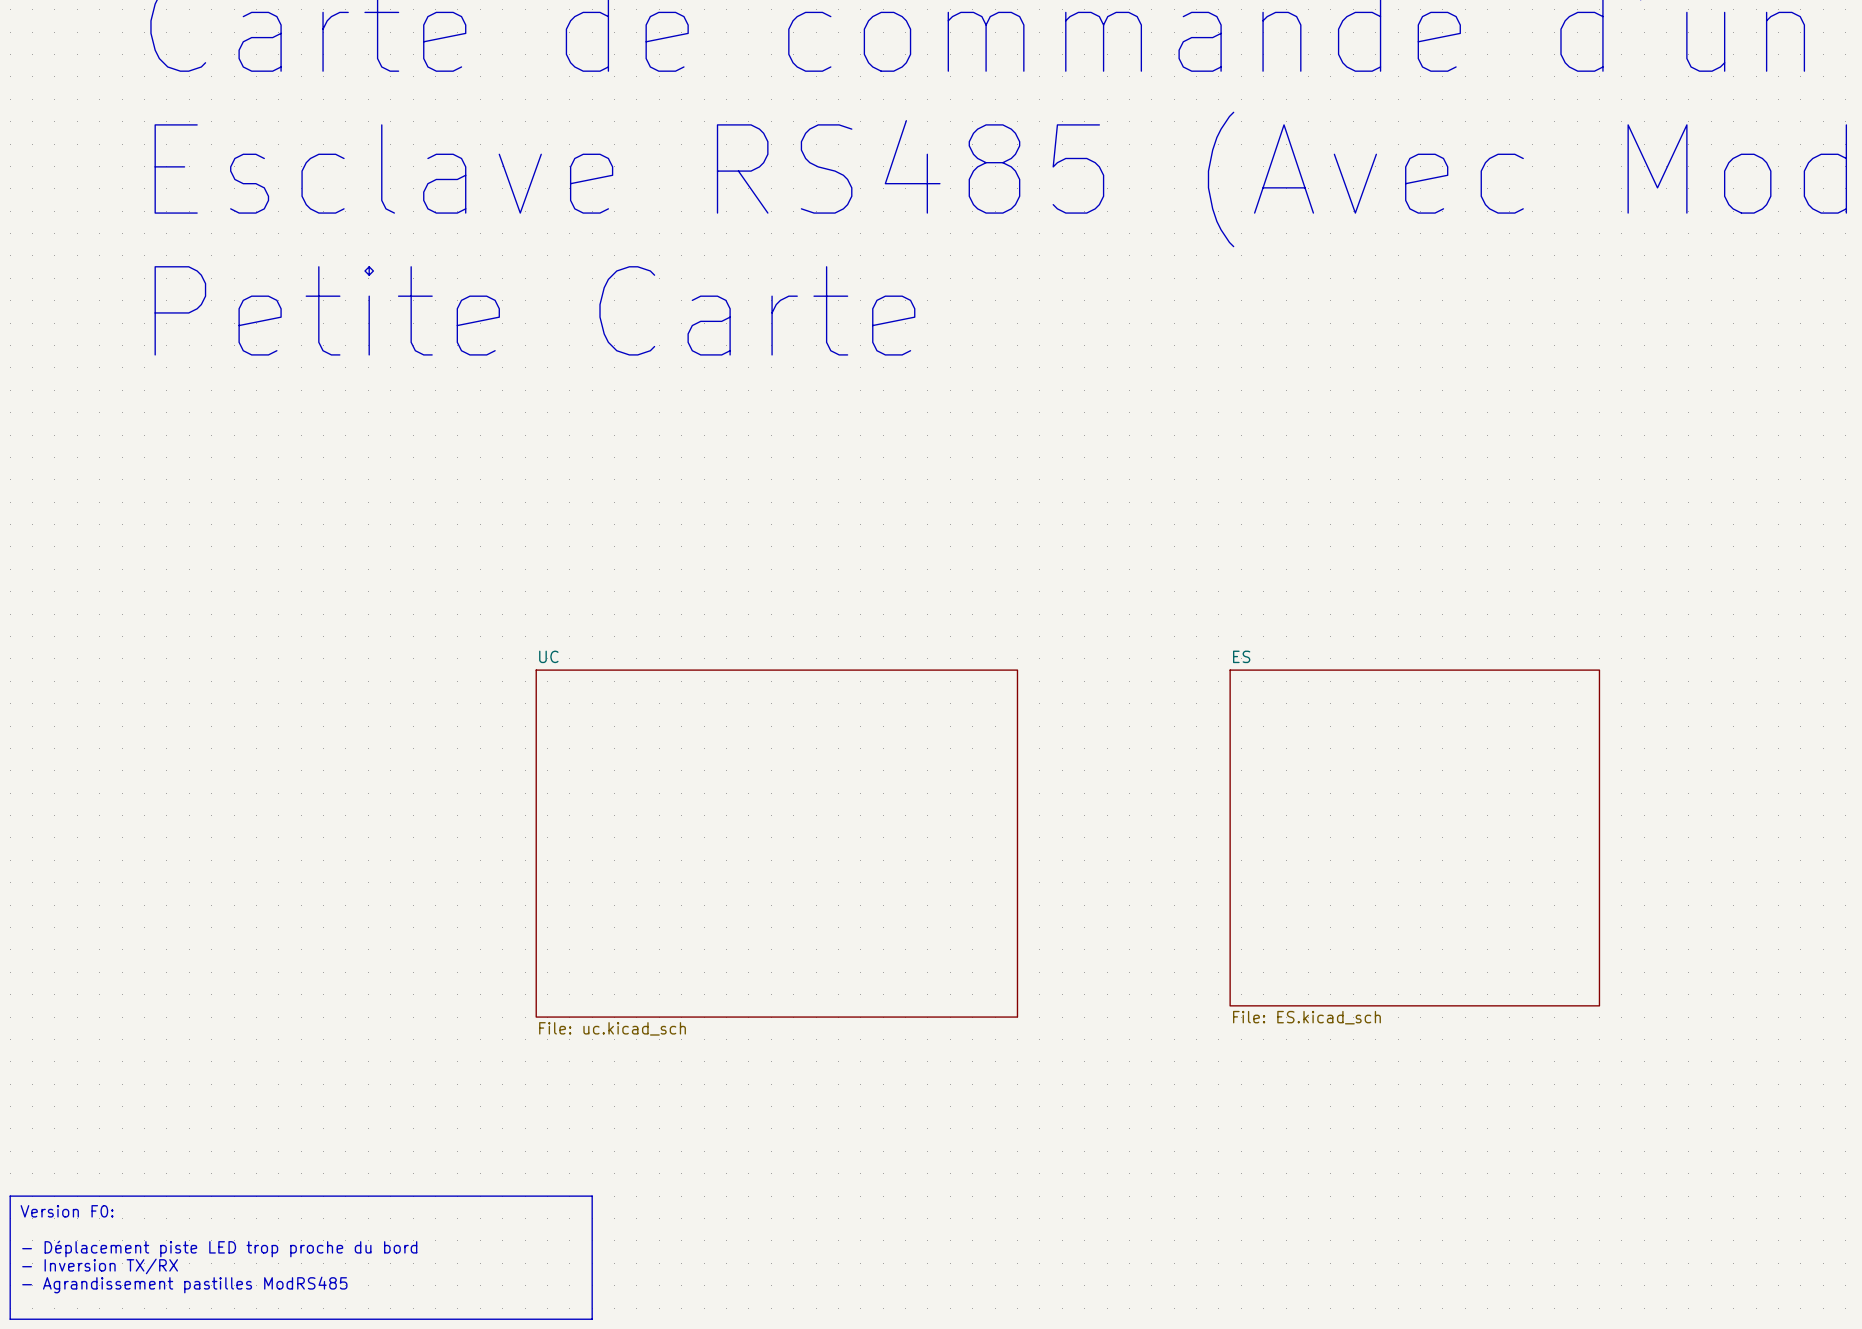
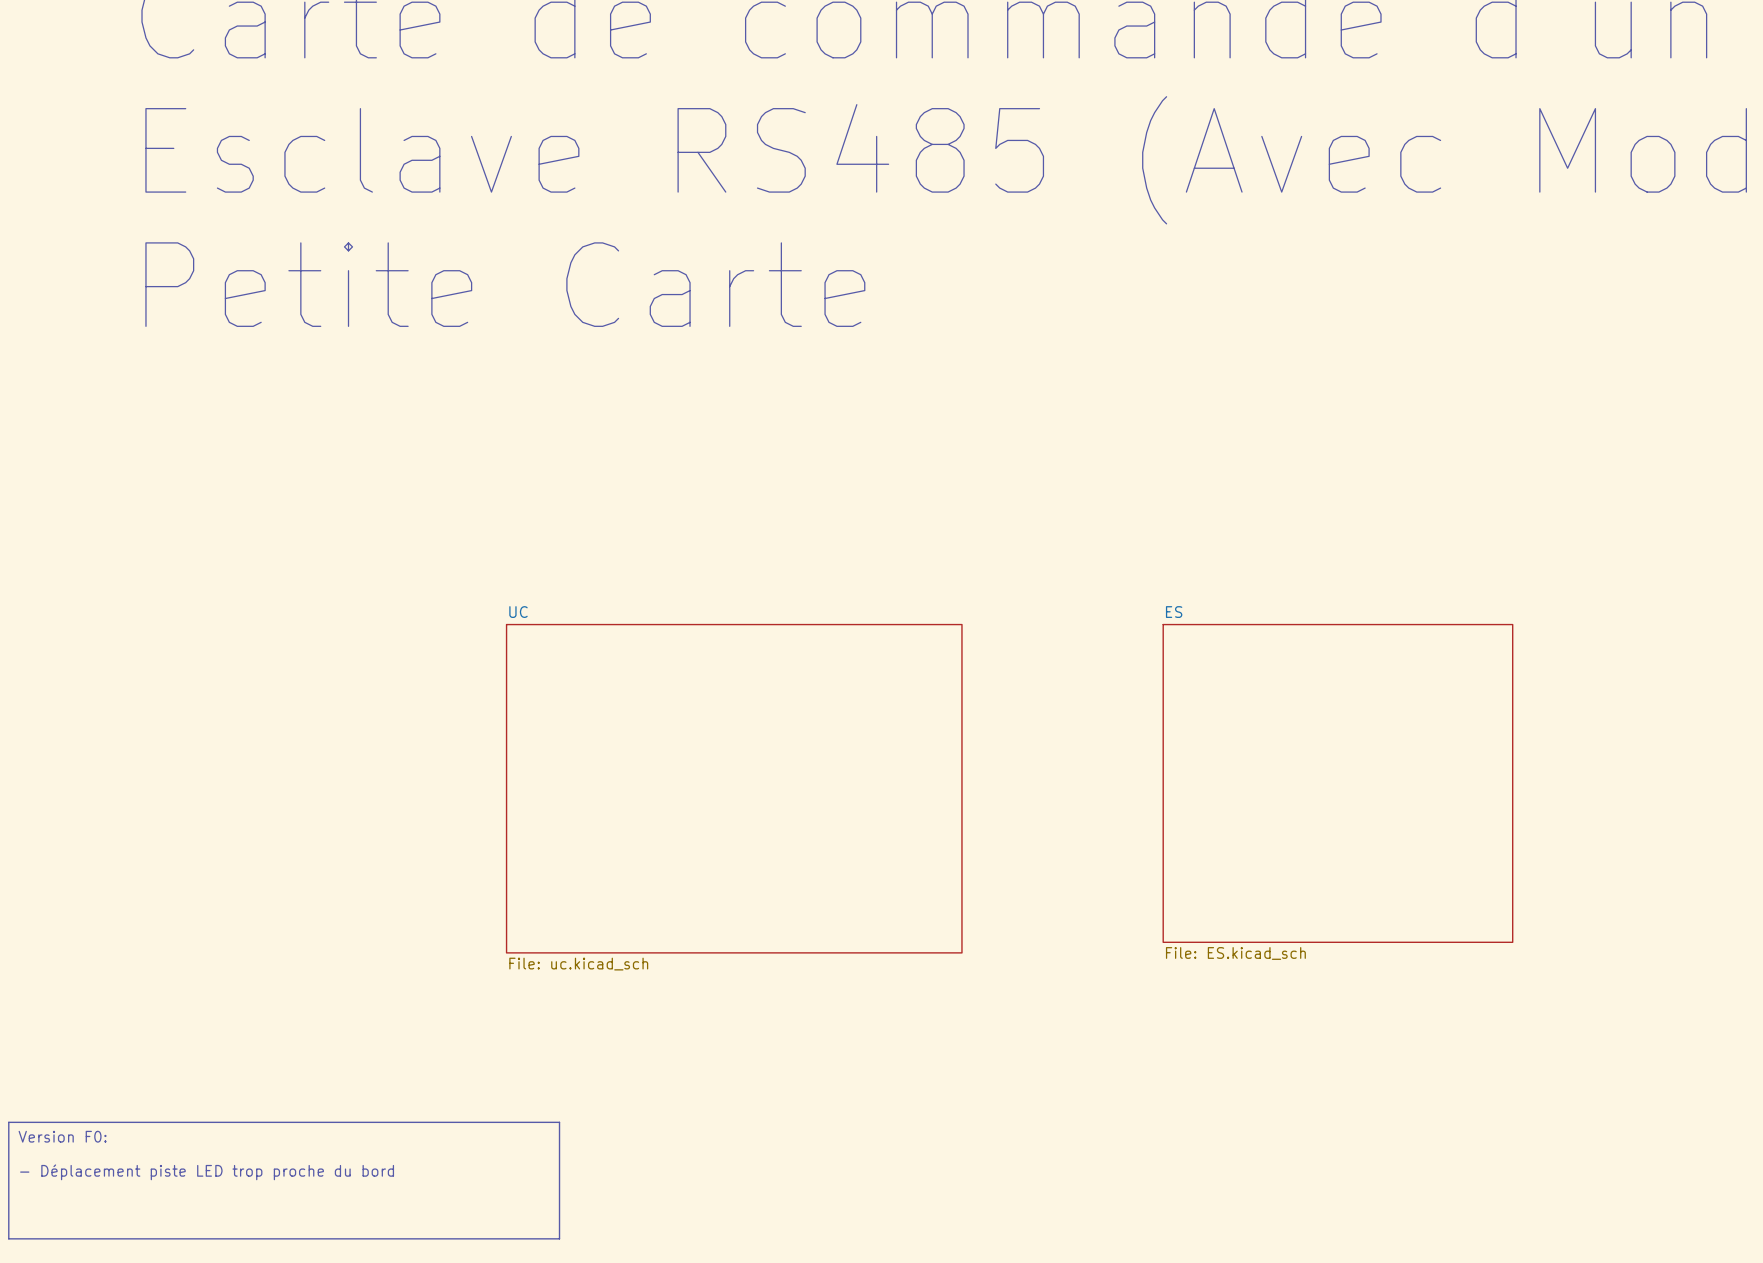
text: - Inversion TX/RX (100, 1266) -> none
text: - Agrandissement pastilles ModRS485 (184, 1284) -> none

